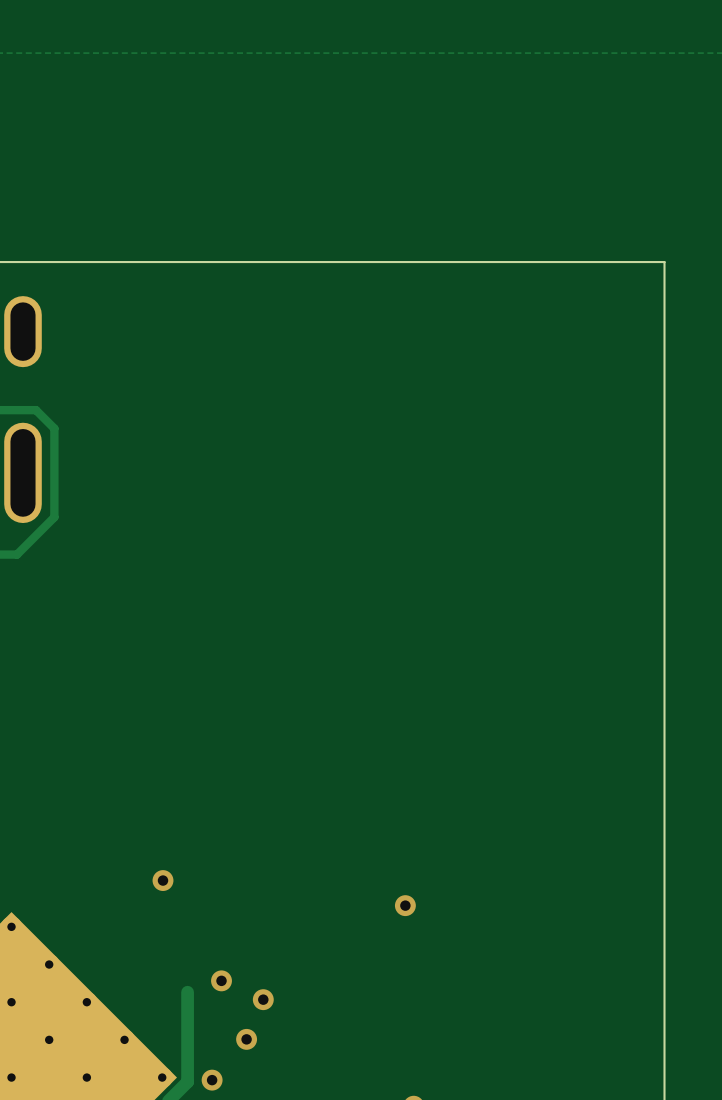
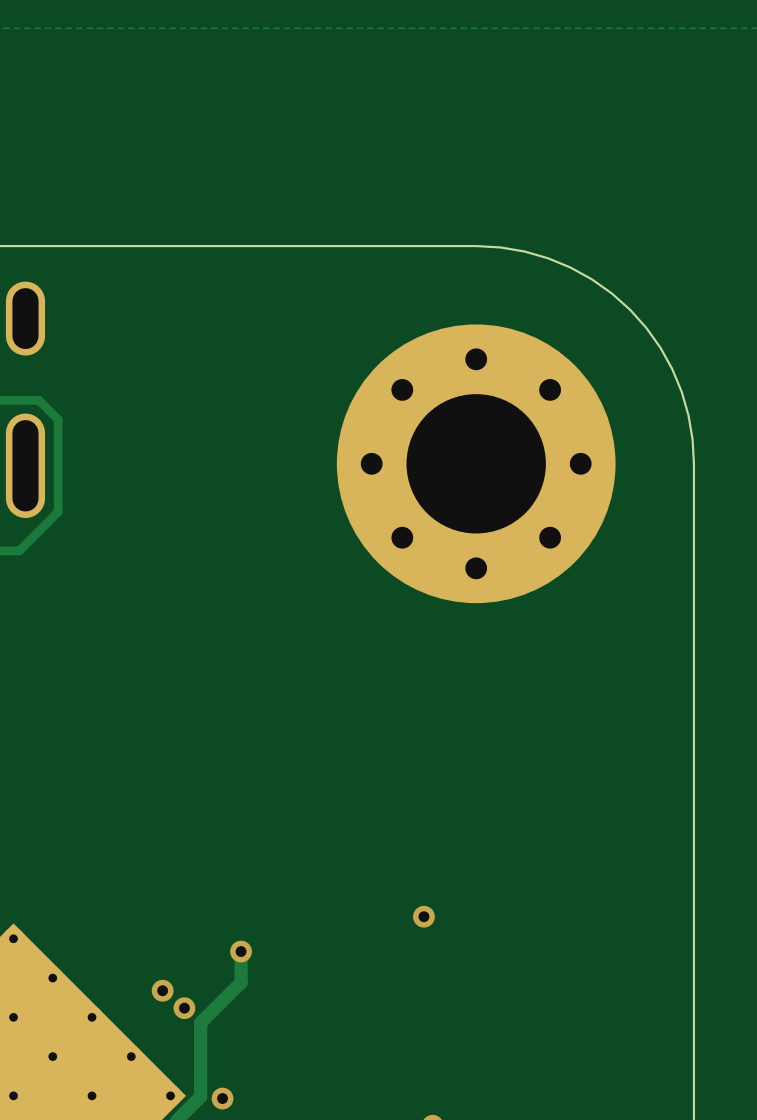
board edge: (455, 262) (664, 262) (664, 471) -> (476, 246) (524, 251) (570, 267) (592, 279) (630, 309) (646, 328) (672, 369) (688, 415) (693, 463)
part: none -> (476, 463)
via: (163, 880) -> none
via: none -> (241, 951)
via: none -> (162, 990)
via: (221, 980) -> none
track: (187, 992) (187, 1081) -> (241, 951) (241, 982) (200, 1022) (200, 1096) (196, 1100)
via: none -> (184, 1008)
via: (263, 999) -> none
via: (246, 1039) -> none

